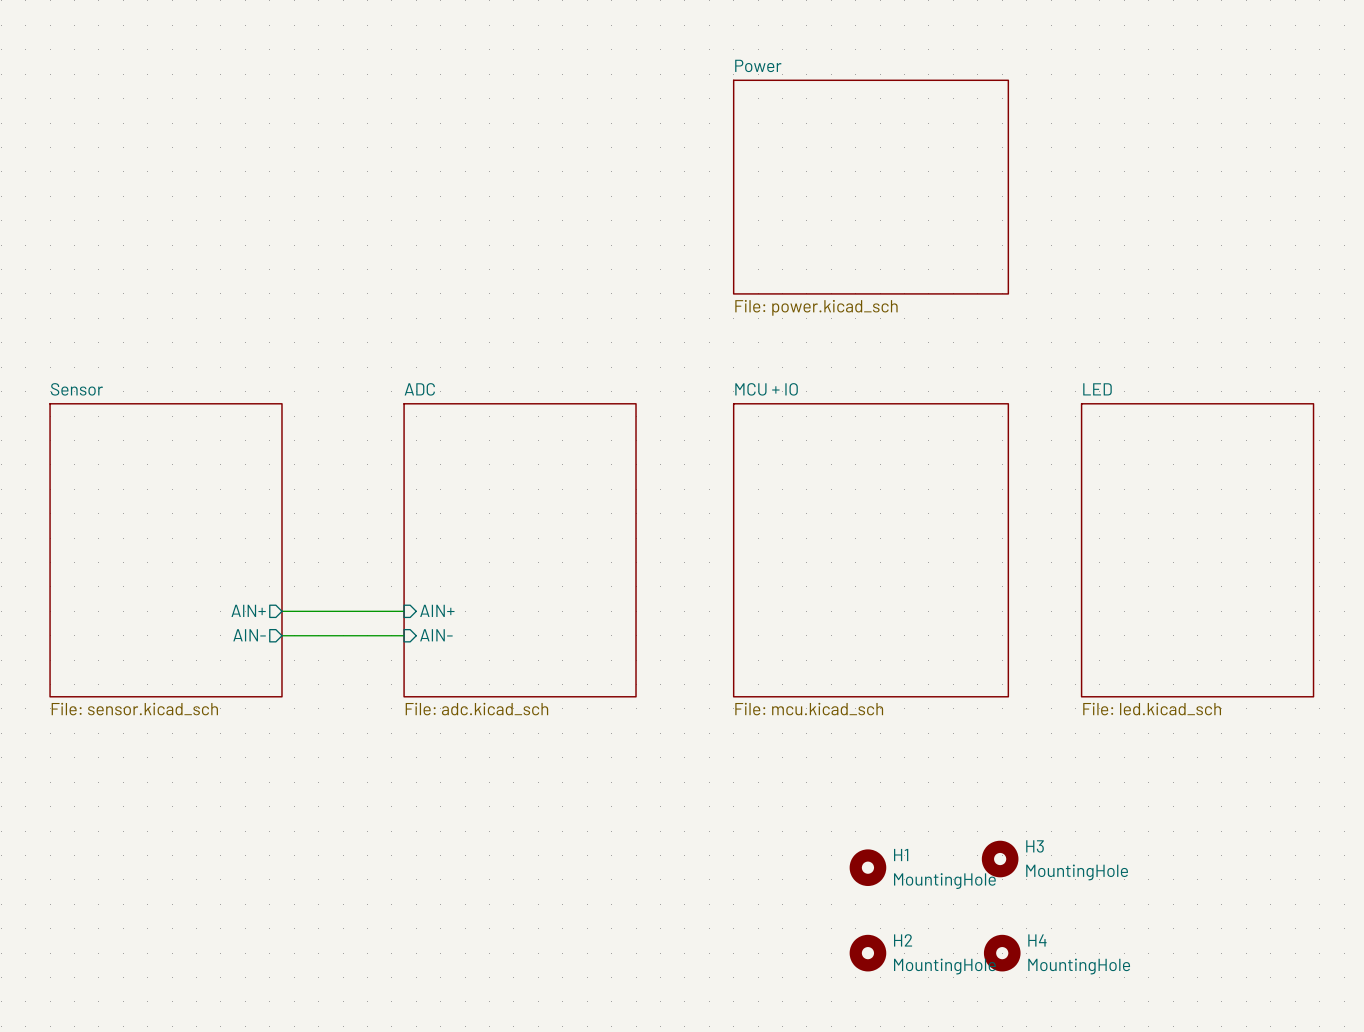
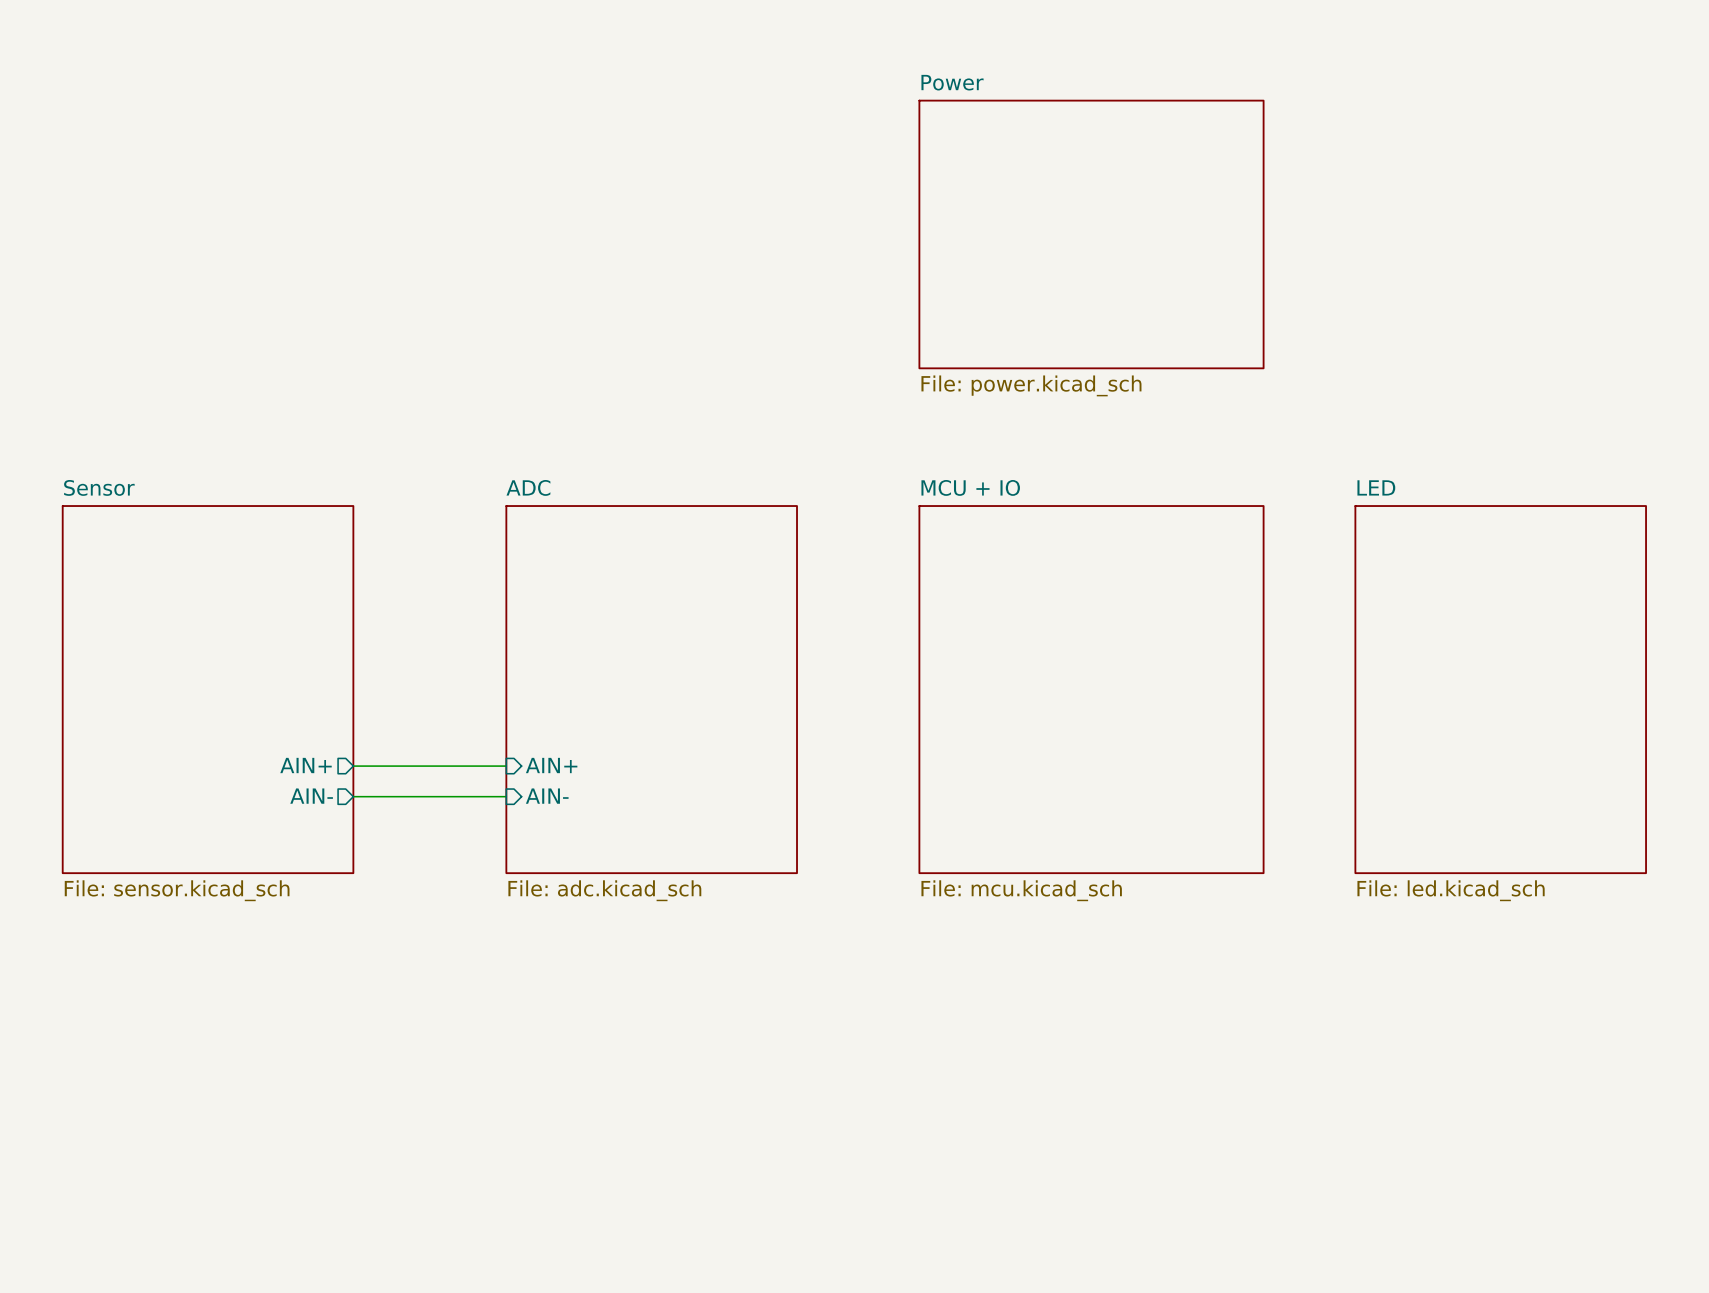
H3: MountingHole (1000, 859) -> none
H1: MountingHole (867, 867) -> none
H2: MountingHole (867, 953) -> none
H4: MountingHole (1002, 953) -> none

